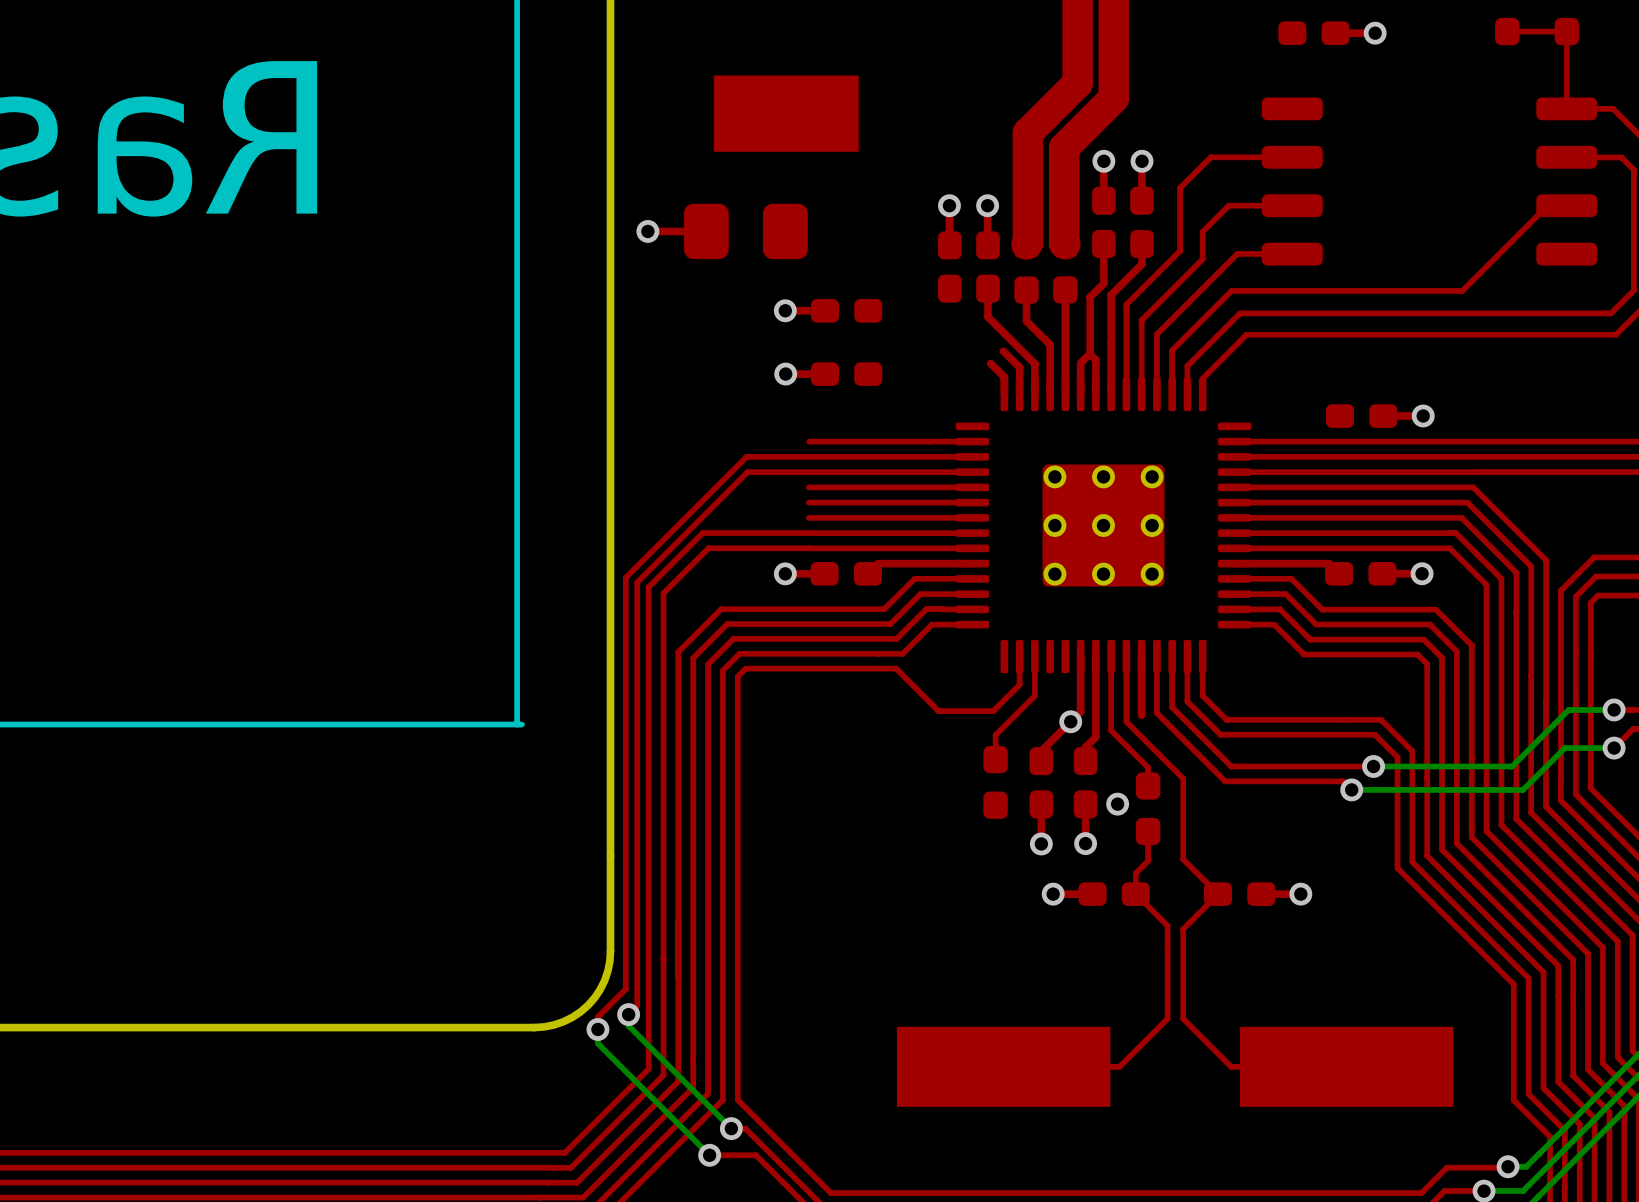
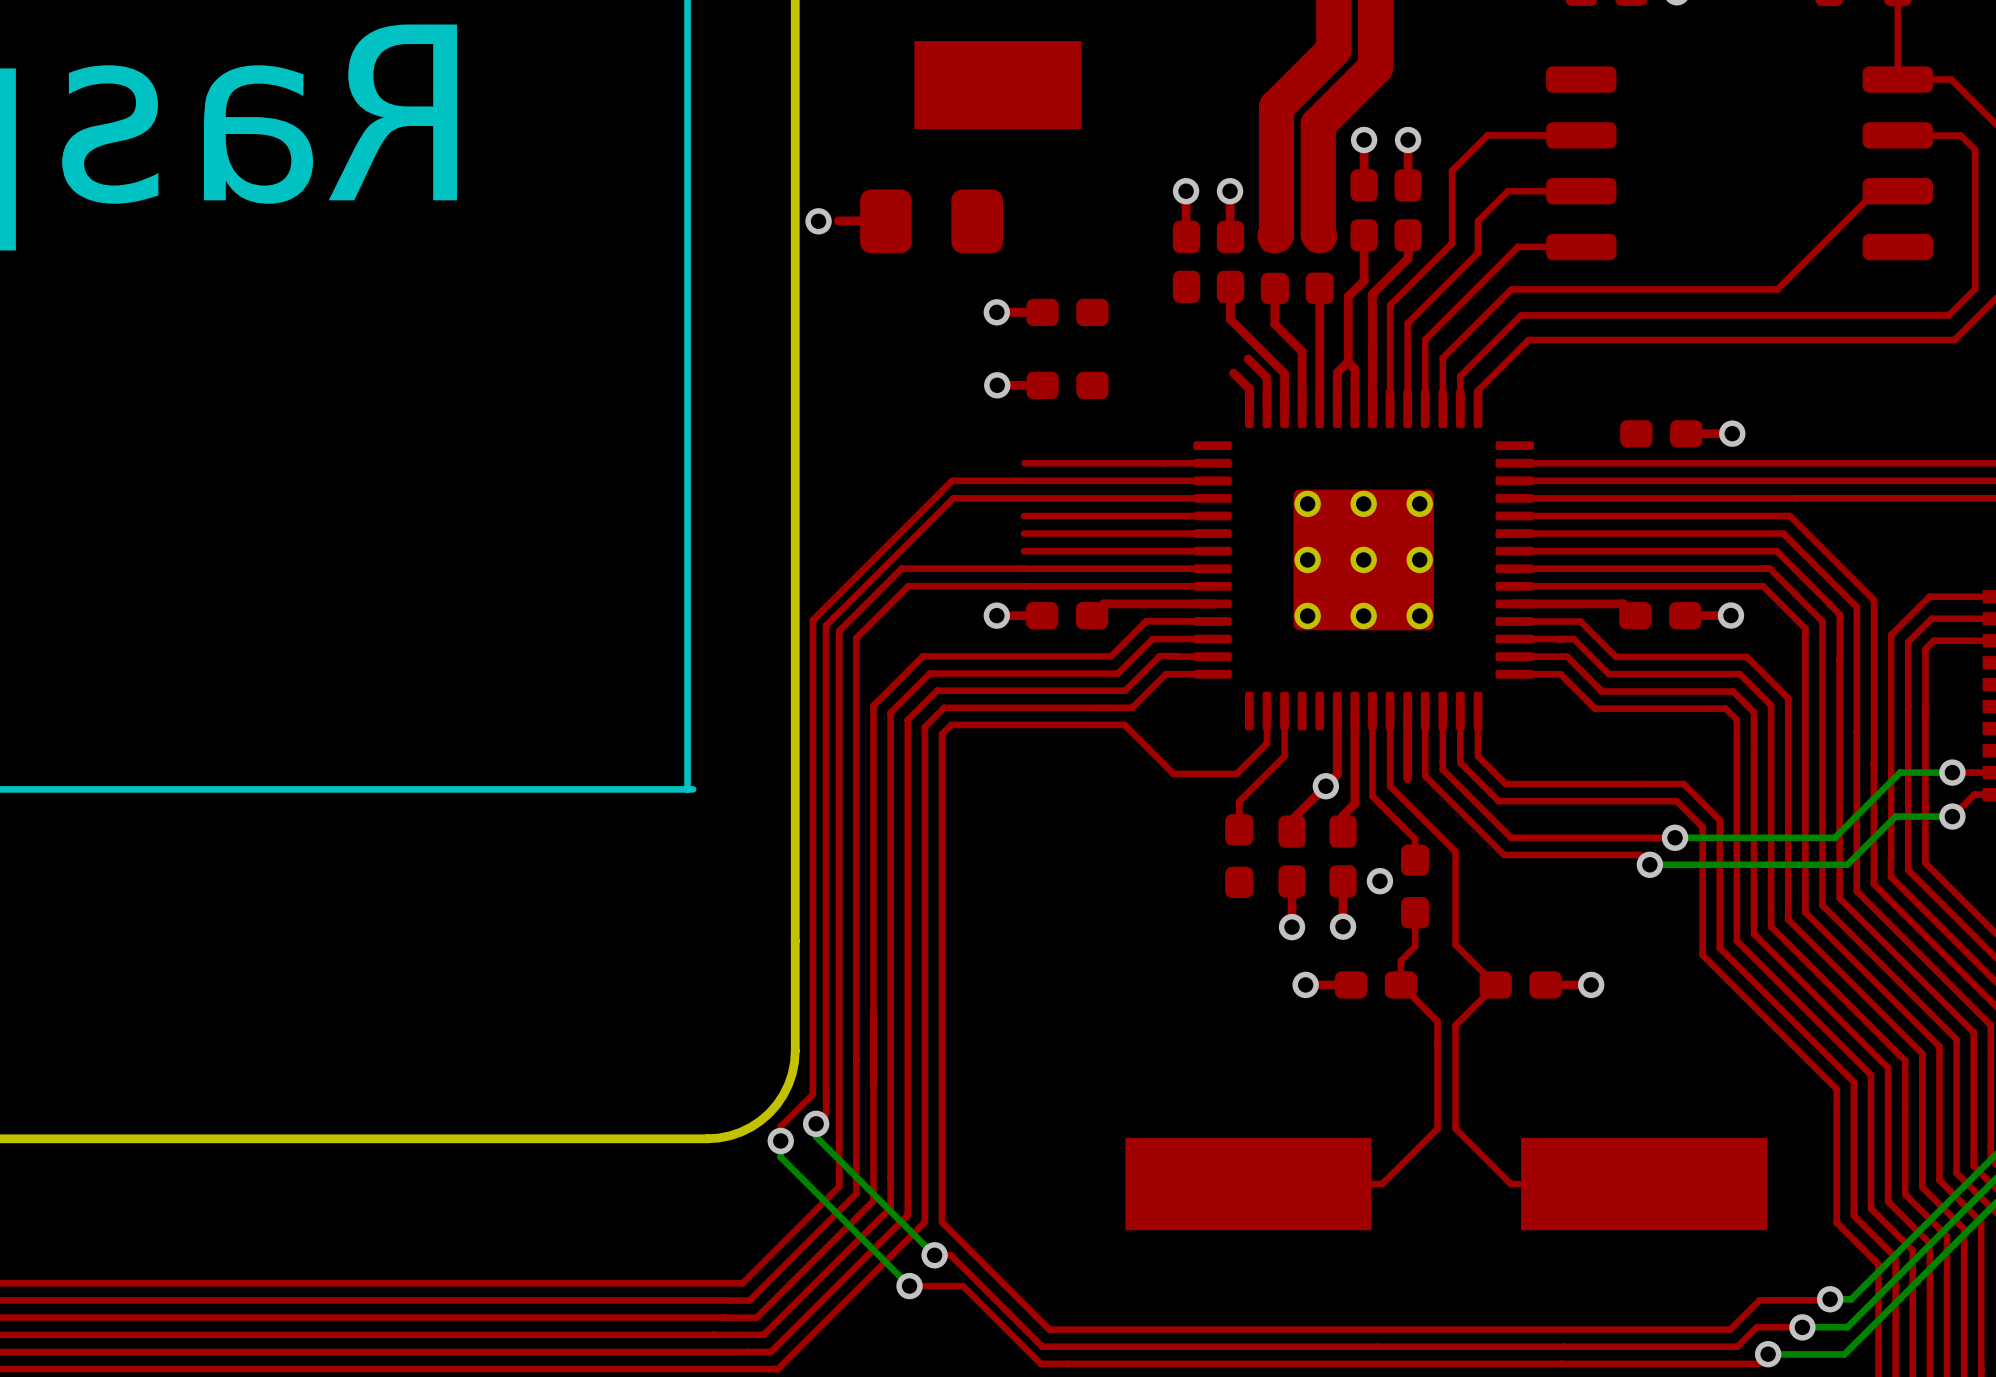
via position: (647, 231) -> (818, 221)
part position: (745, 231) -> (931, 221)

